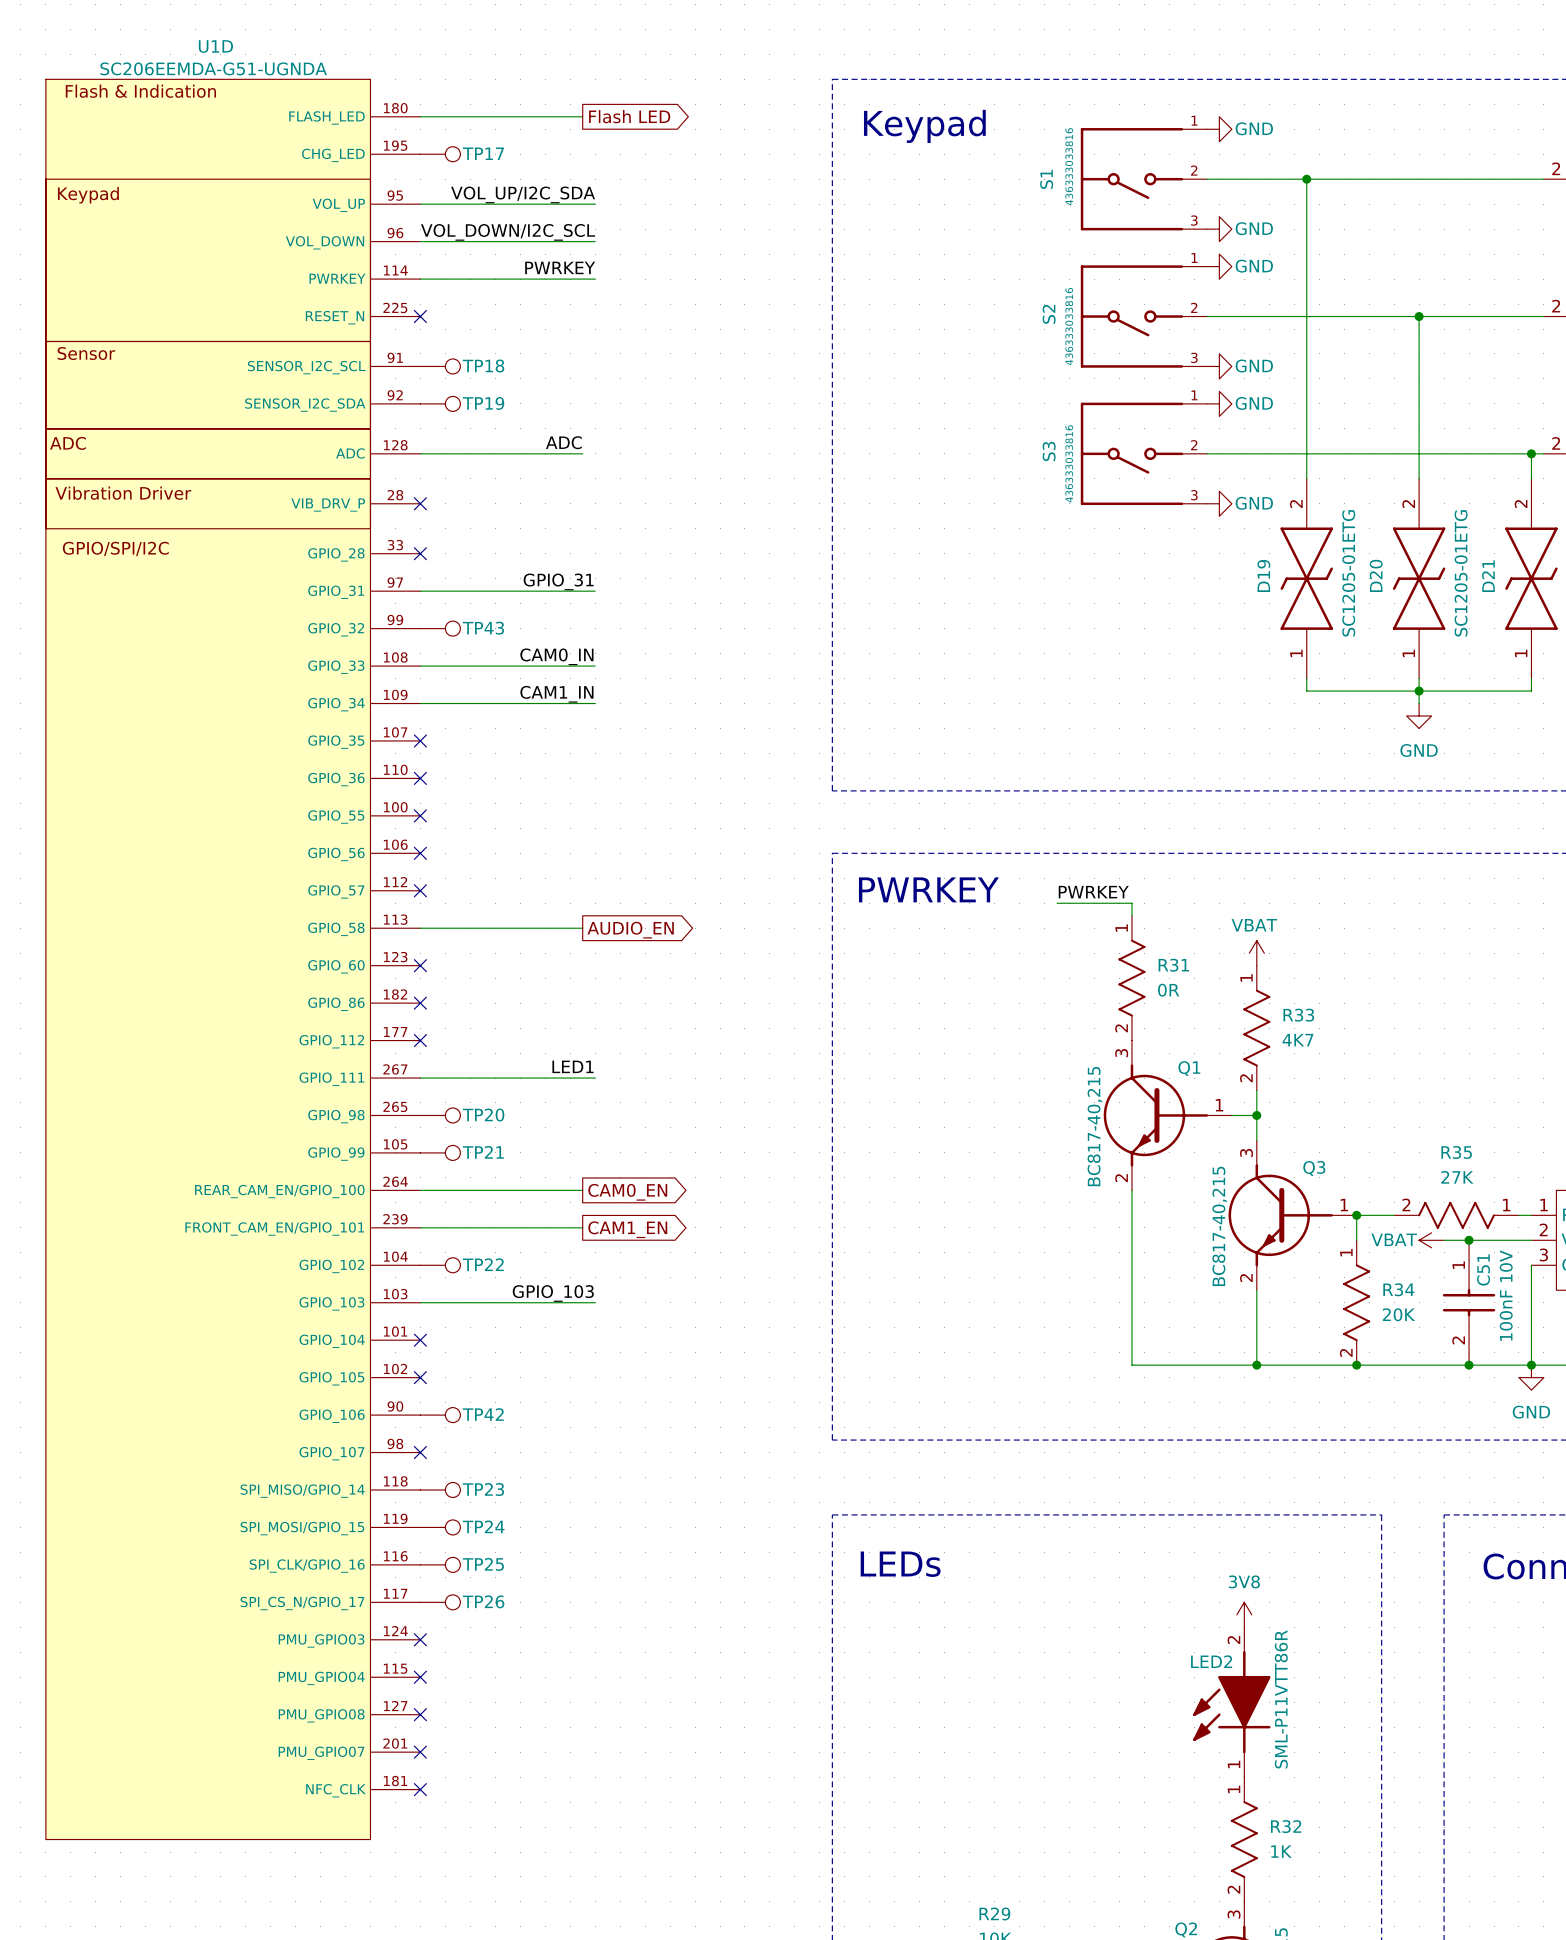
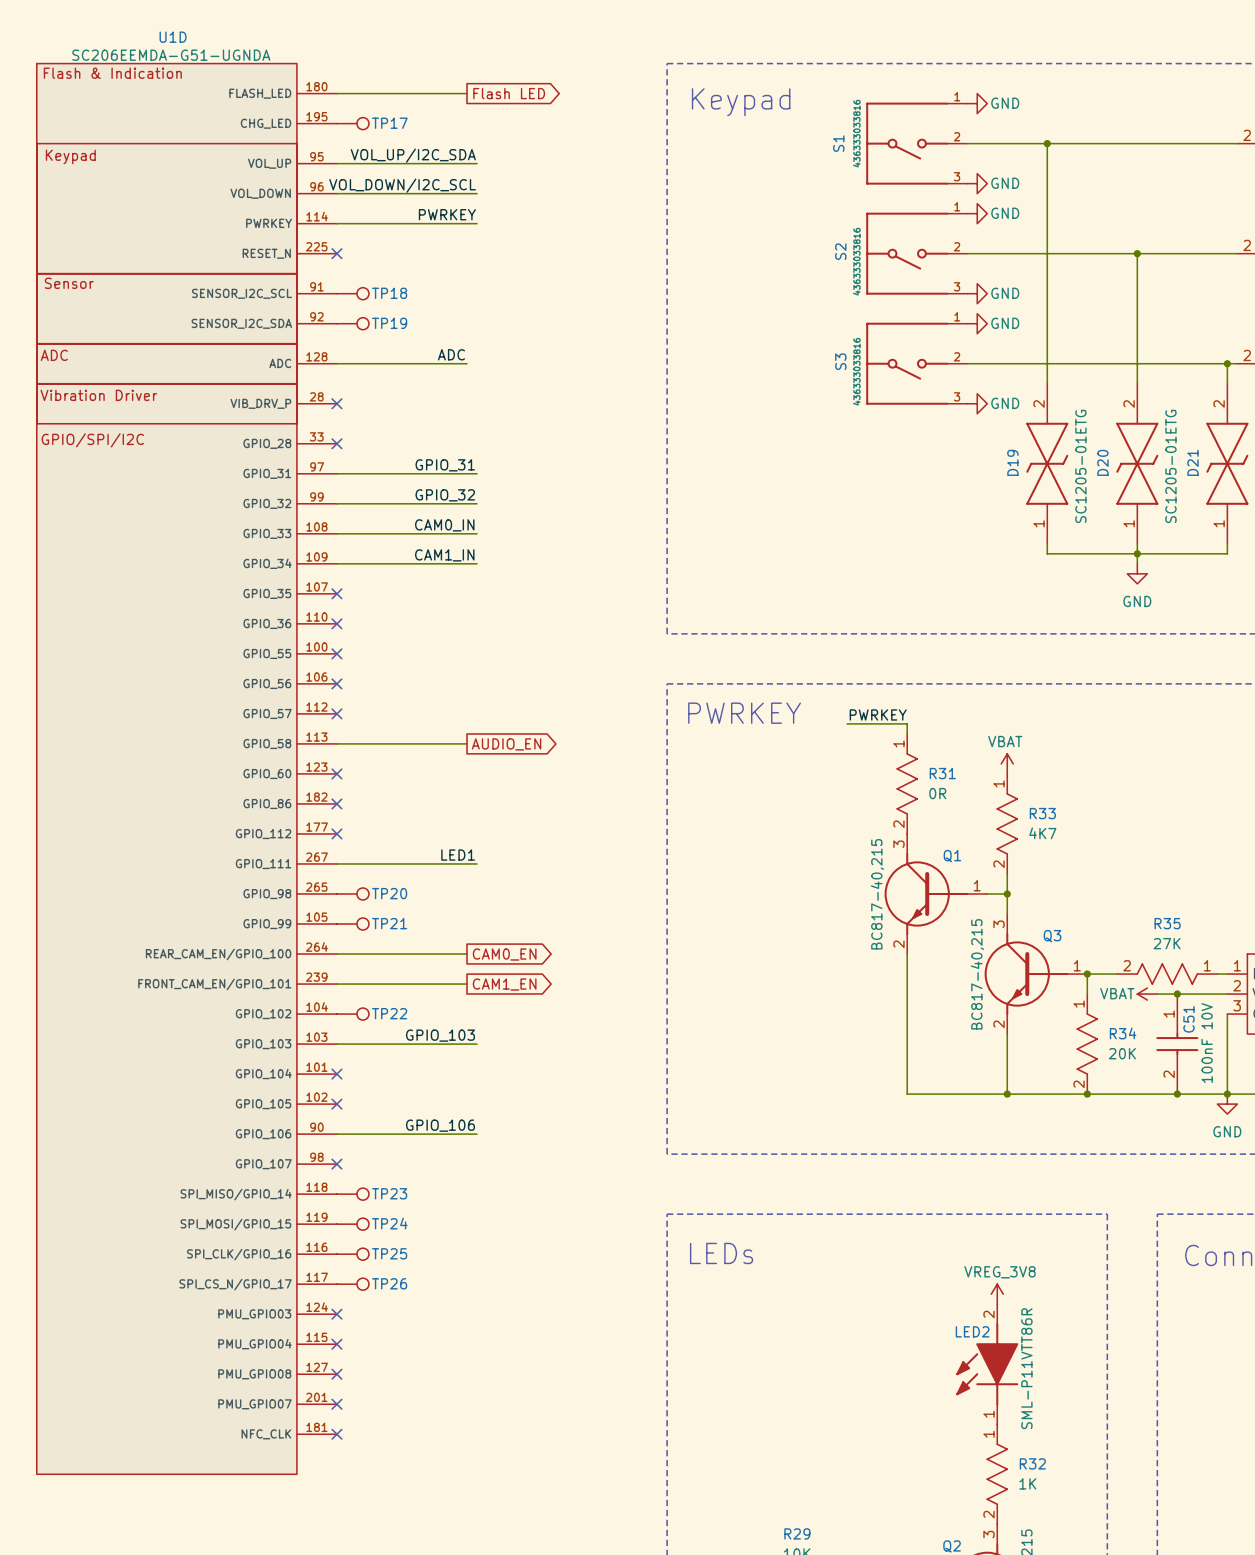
label: none -> GPIO_32 (445, 495)
wire: none -> (336, 503) (477, 503)
TP43: (440, 628) -> none
label: none -> GPIO_106 (440, 1125)
wire: none -> (336, 1134) (477, 1134)
TP42: (440, 1415) -> none
power symbol: 3V8 (1244, 1614) -> VREG_3V8 (997, 1294)

